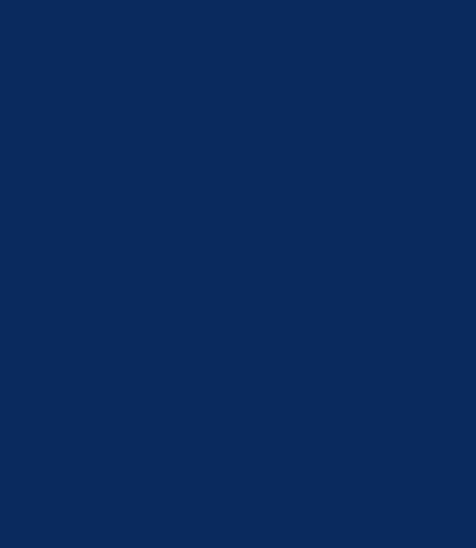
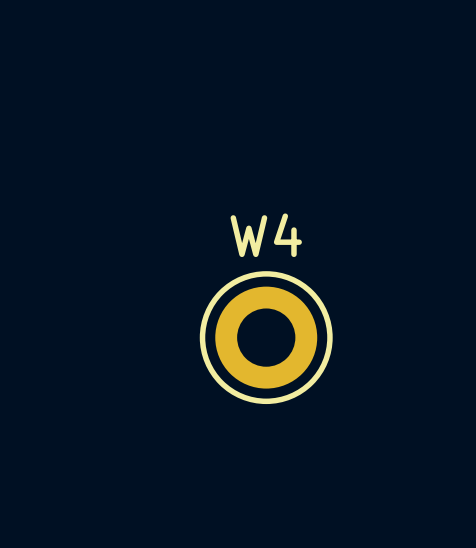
W4: none -> (266, 337)

